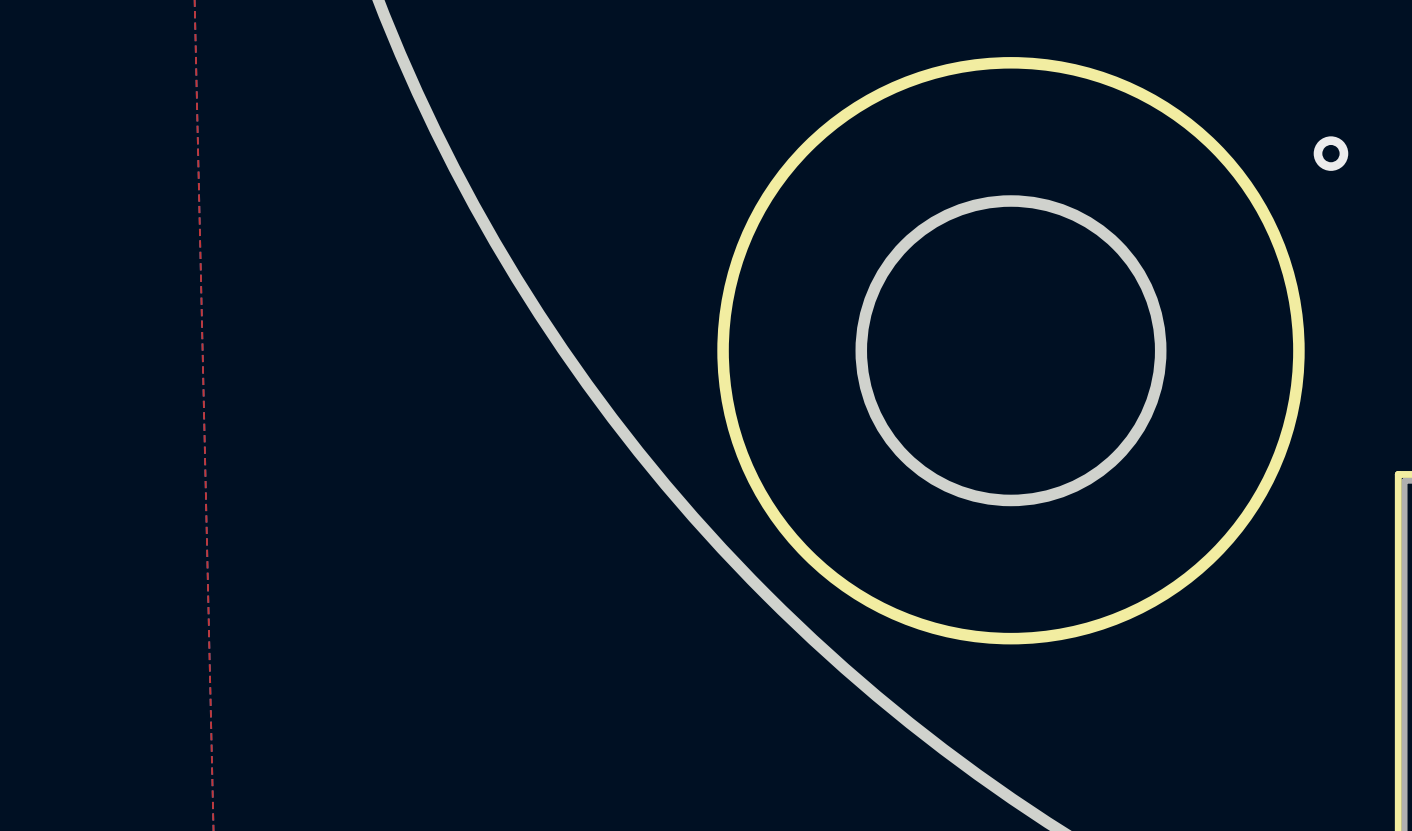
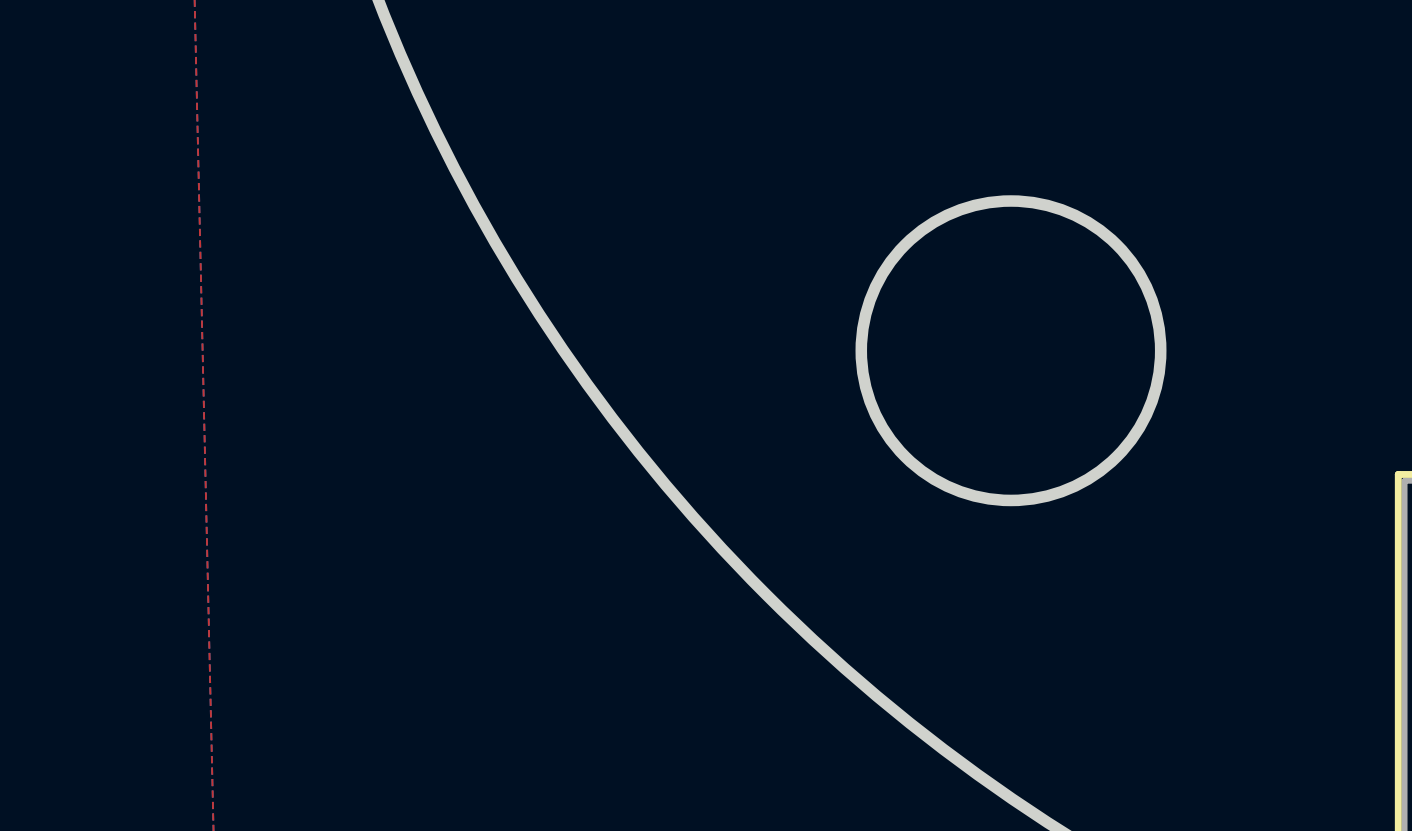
drawing: [717, 57, 1305, 645] -> none
via: (1330, 153) -> none

